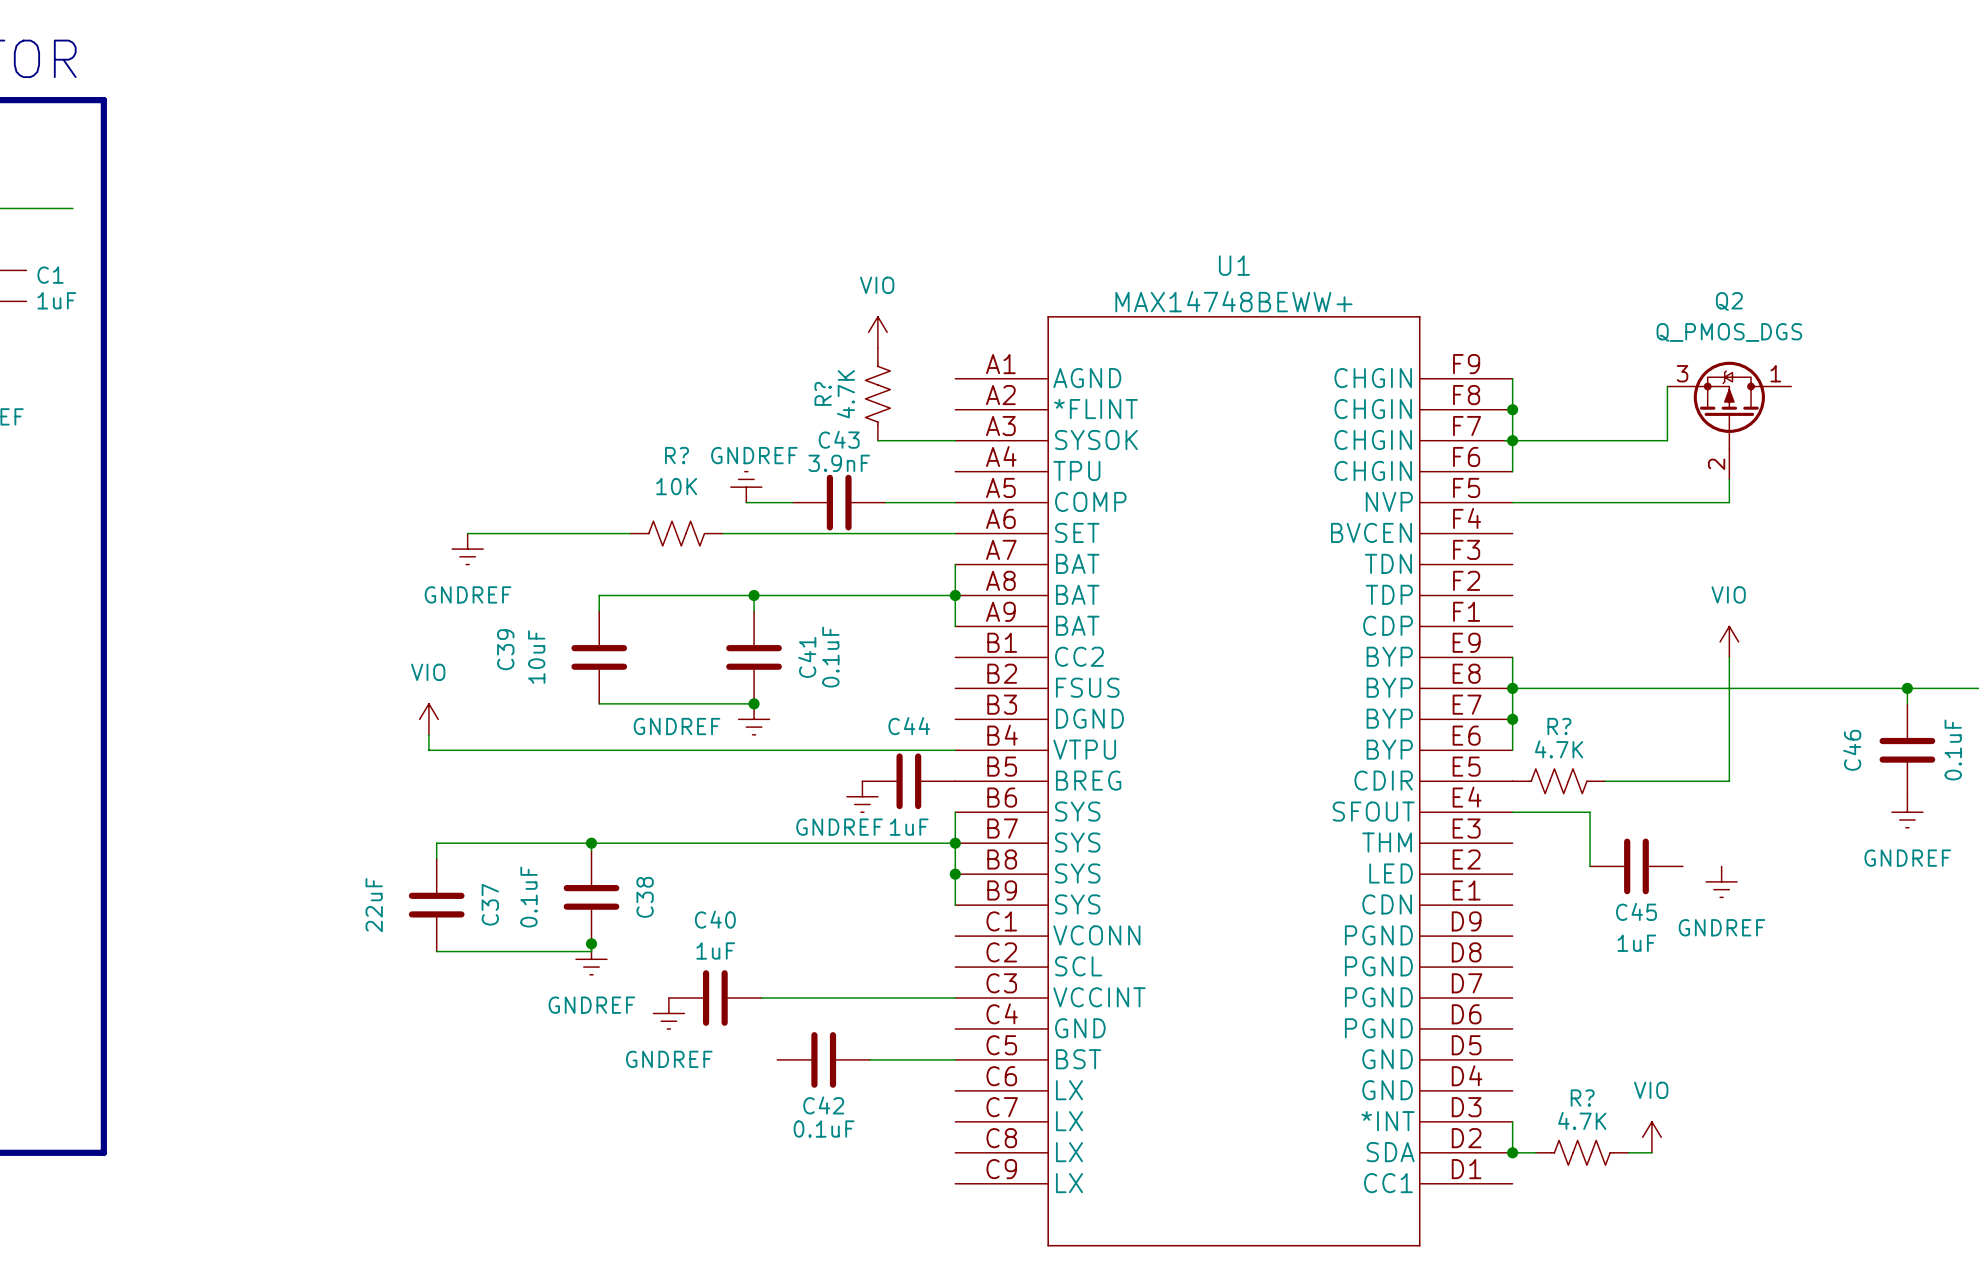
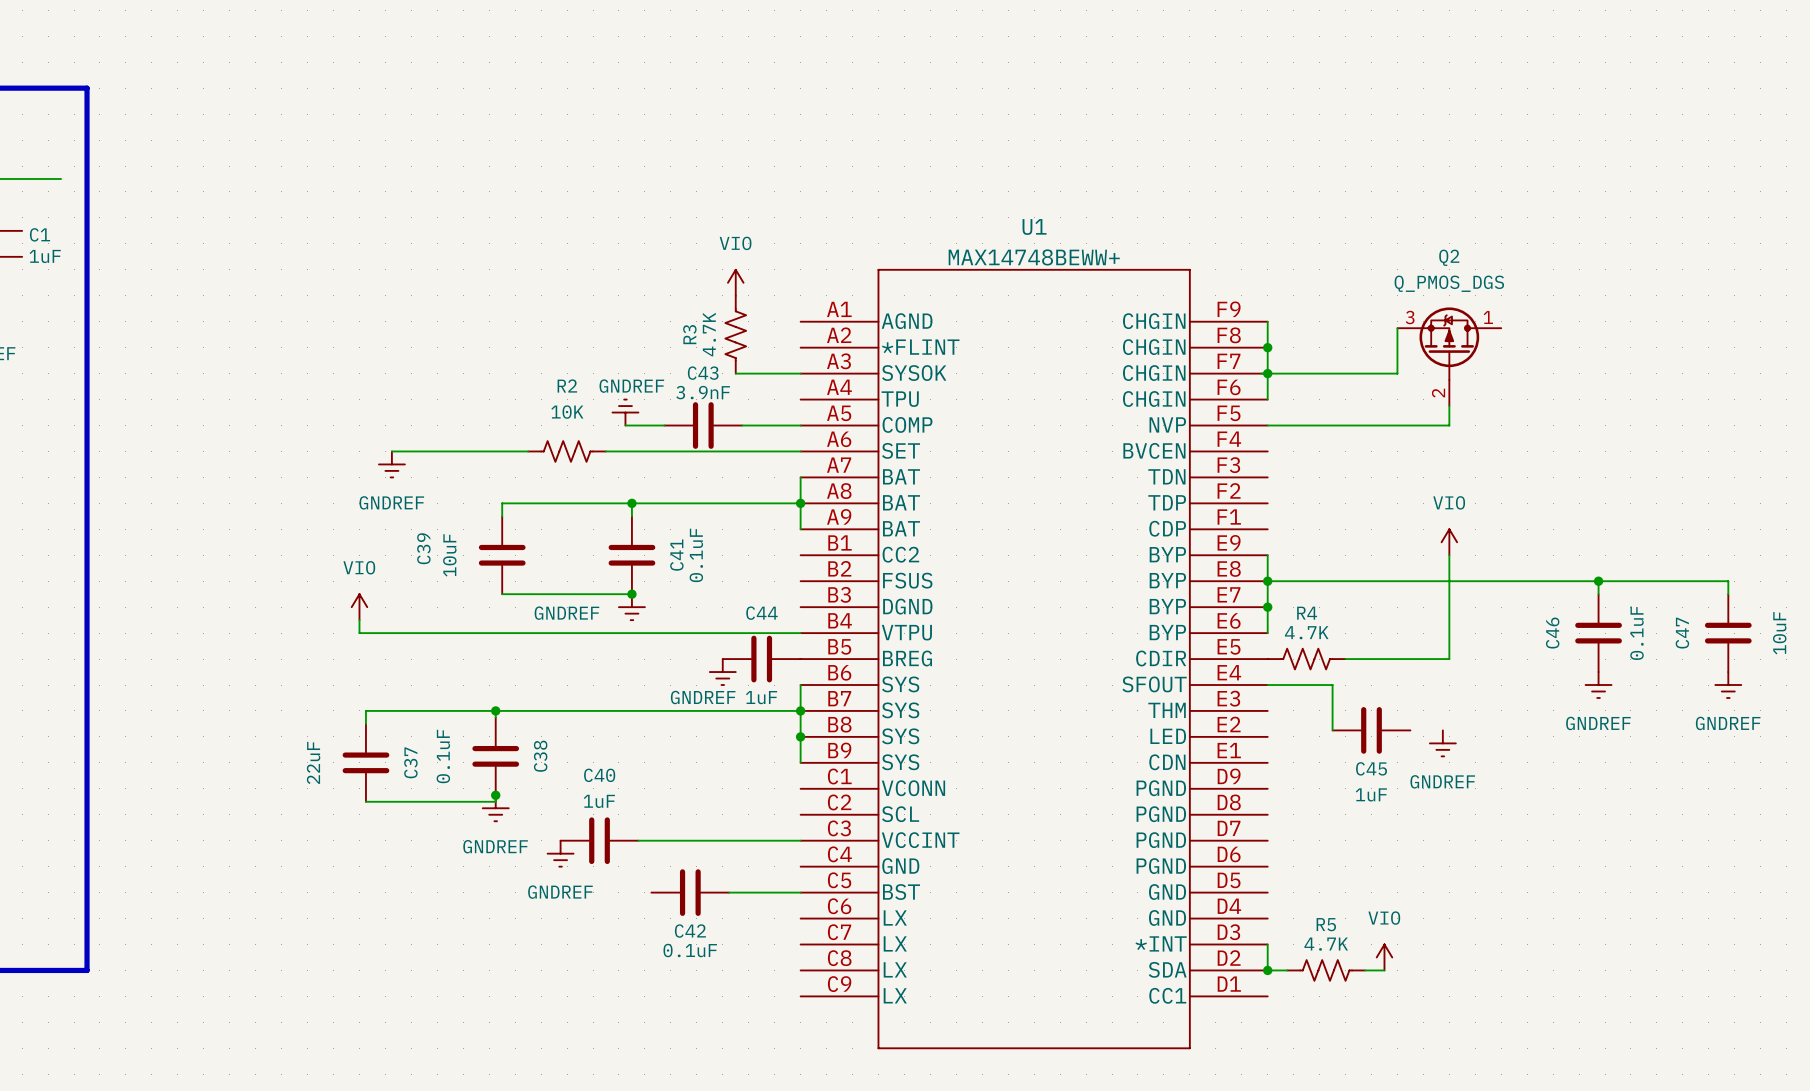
R? name: R? (823, 393) -> R3 (689, 334)
R? name: R? (677, 455) -> R2 (567, 385)
R? name: R? (1559, 726) -> R4 (1307, 613)
R? name: R? (1582, 1098) -> R5 (1326, 924)

